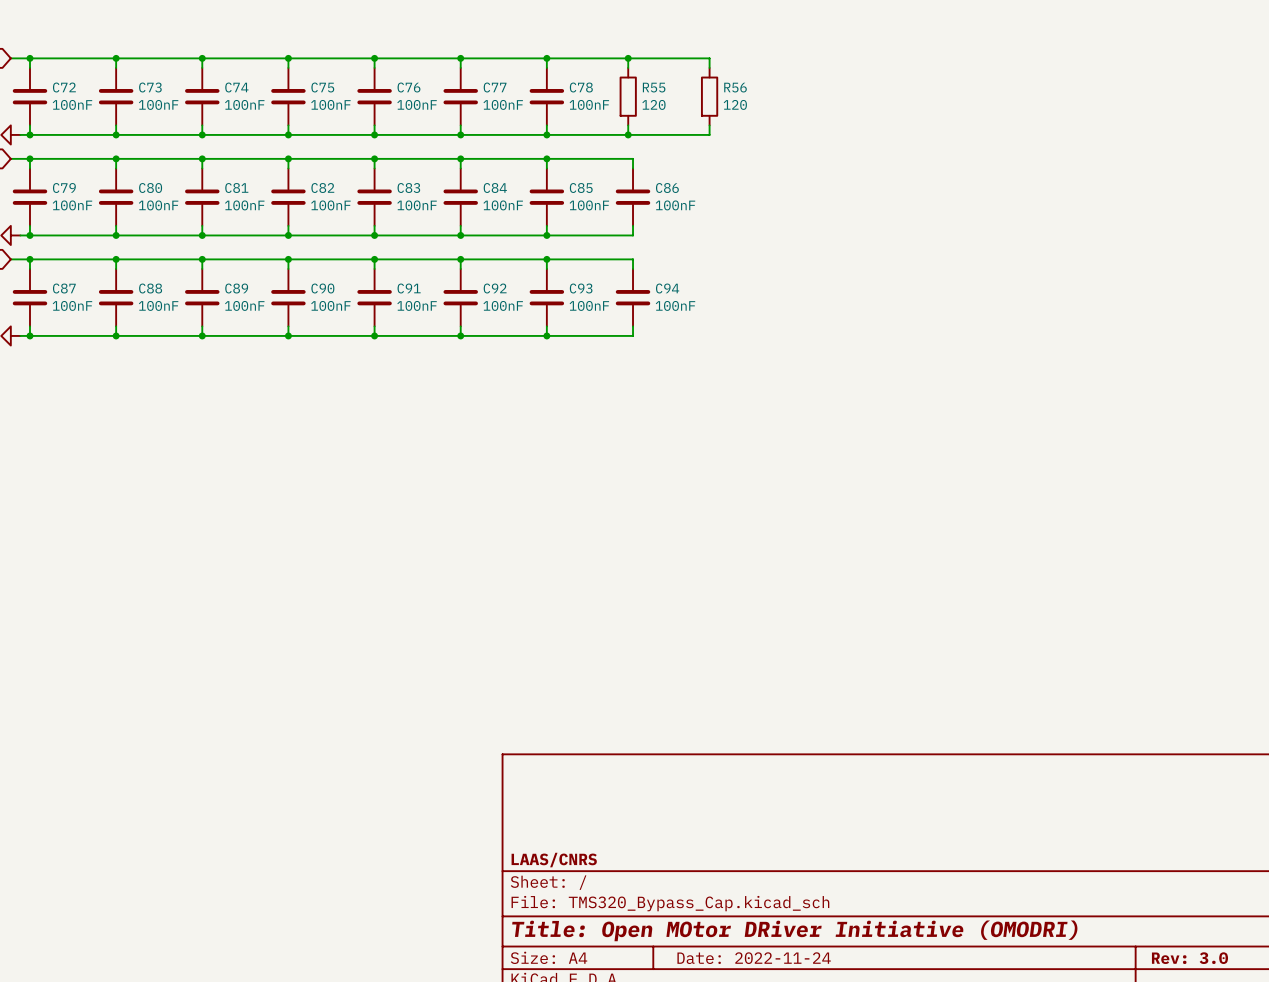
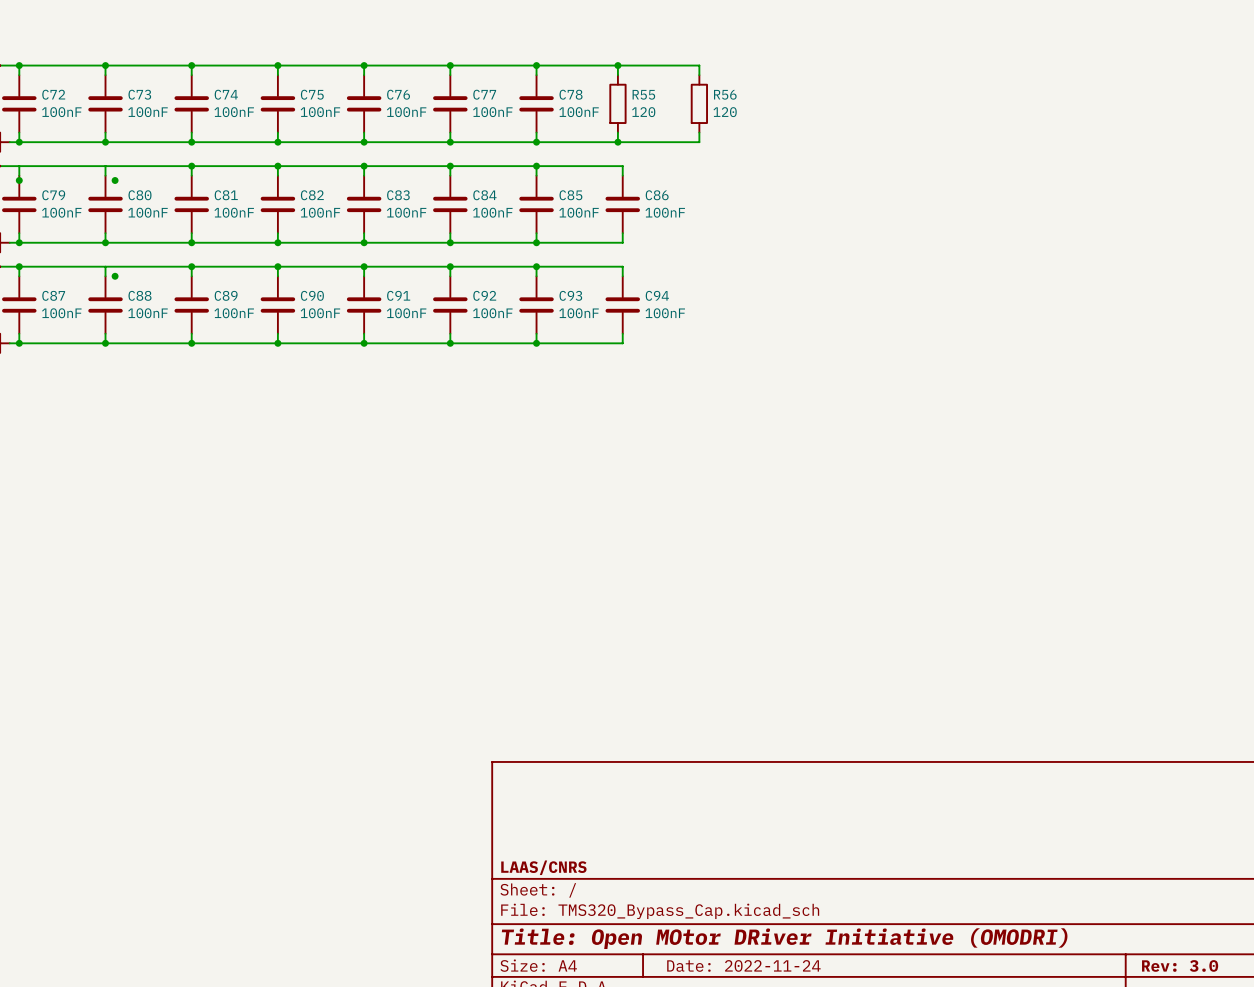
junction position: (29, 158) -> (19, 180)
junction position: (116, 158) -> (115, 180)
junction position: (116, 259) -> (115, 276)

